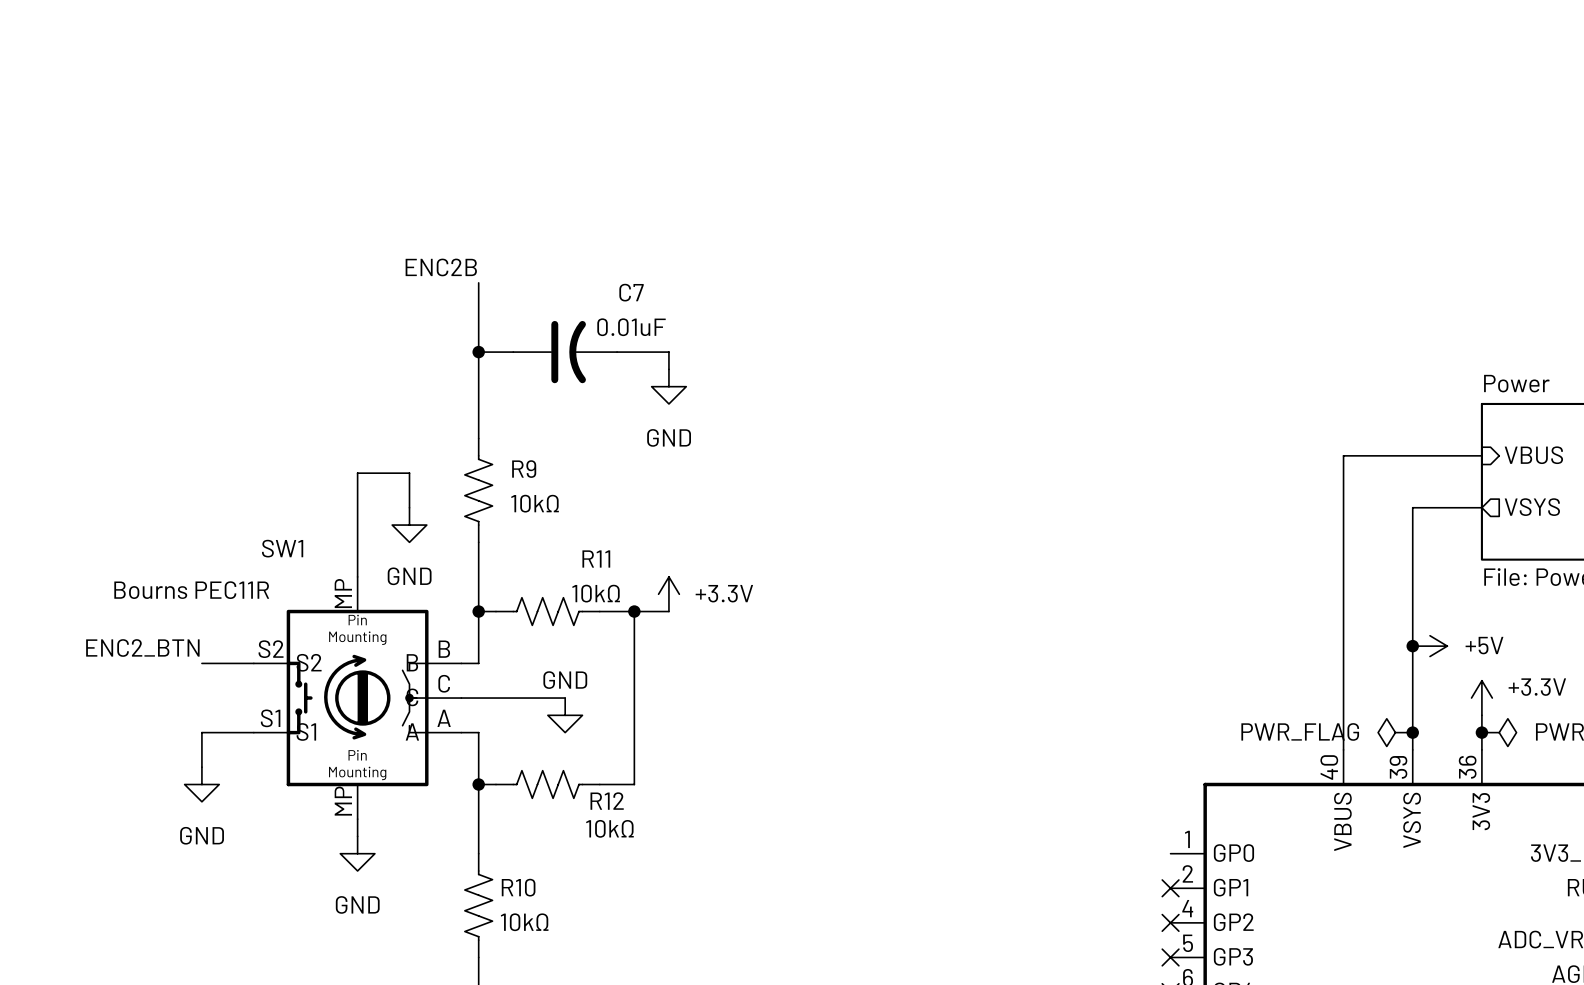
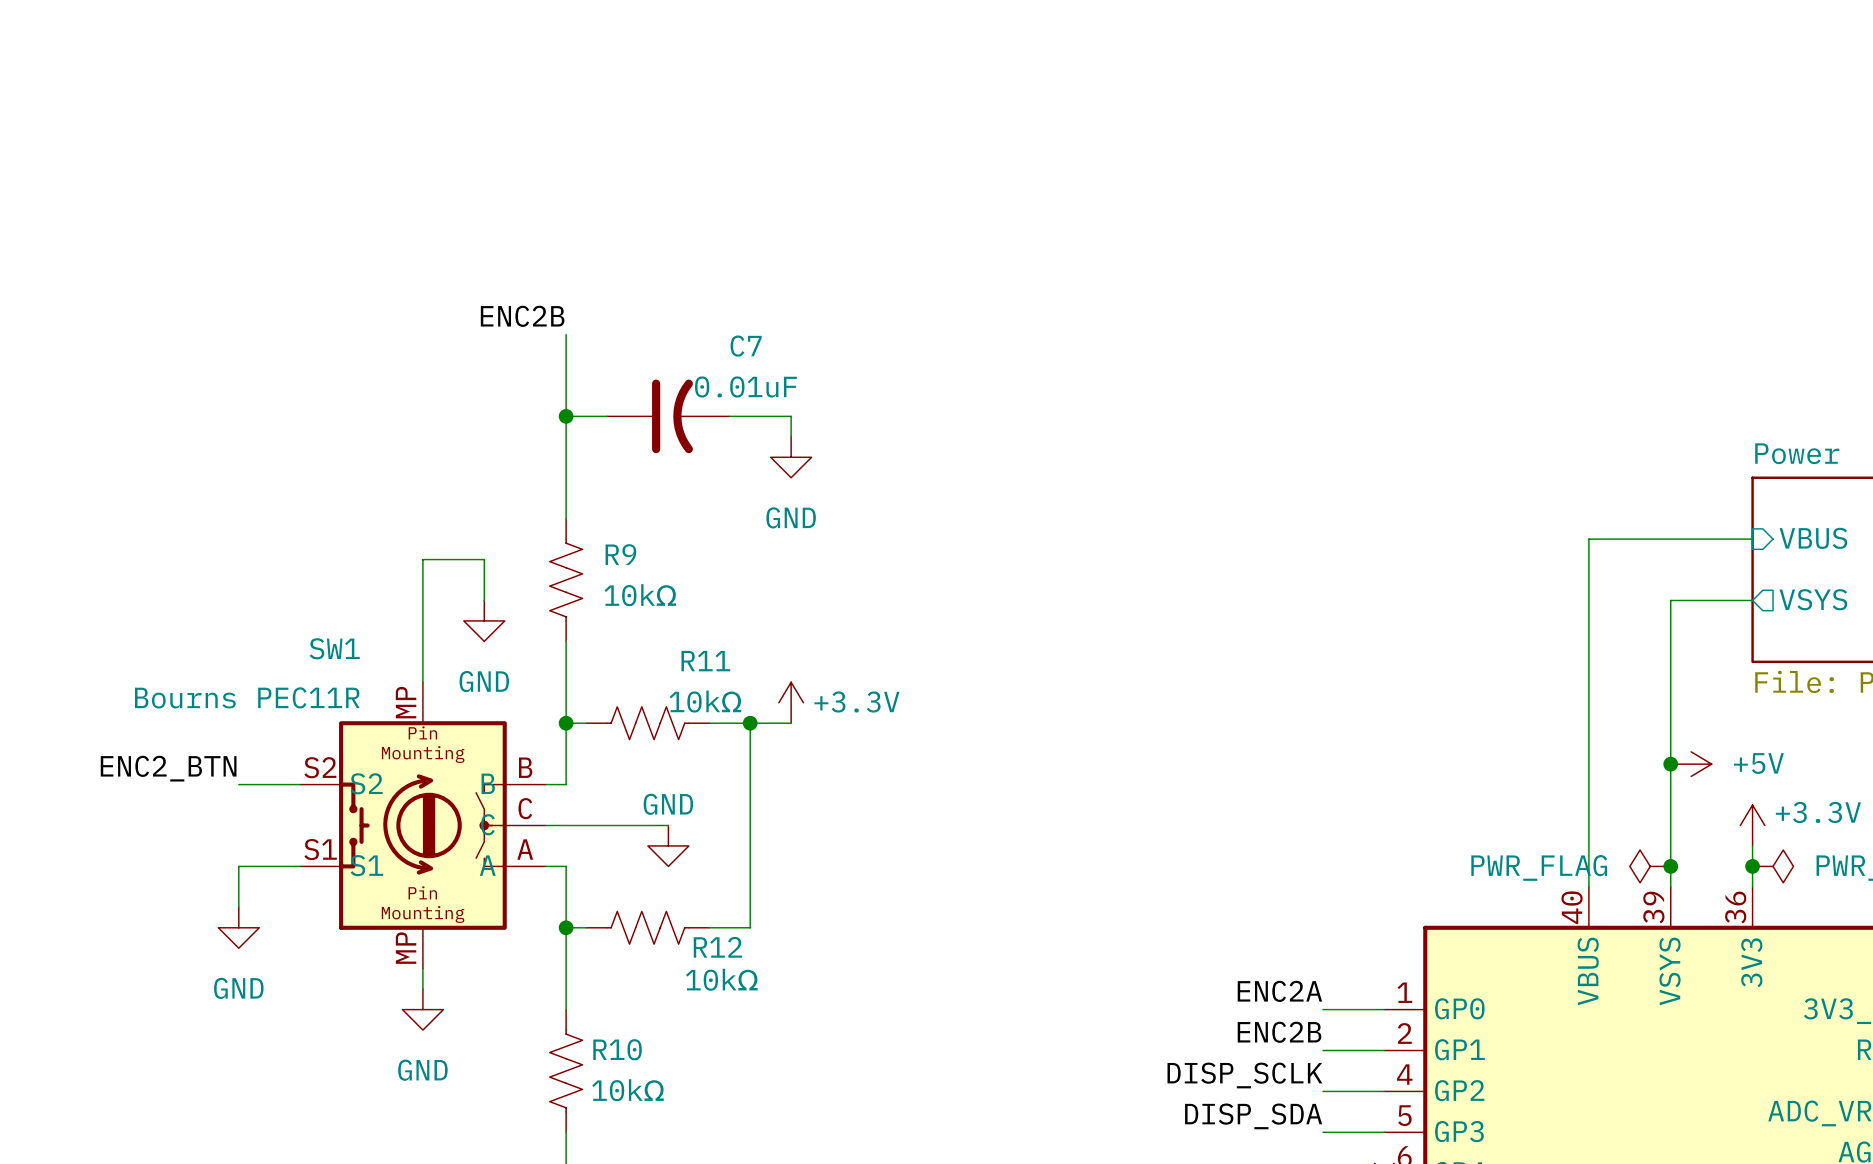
label: none -> ENC2A (1279, 991)
wire: none -> (1322, 1009) (1384, 1009)
label: none -> ENC2B (1279, 1032)
wire: none -> (1322, 1050) (1384, 1050)
no-connect mark: (1170, 888) -> none
label: none -> DISP_SCLK (1244, 1075)
wire: none -> (1322, 1091) (1384, 1091)
no-connect mark: (1170, 922) -> none
label: none -> DISP_SDA (1253, 1116)
wire: none -> (1322, 1132) (1384, 1132)
no-connect mark: (1170, 957) -> none

